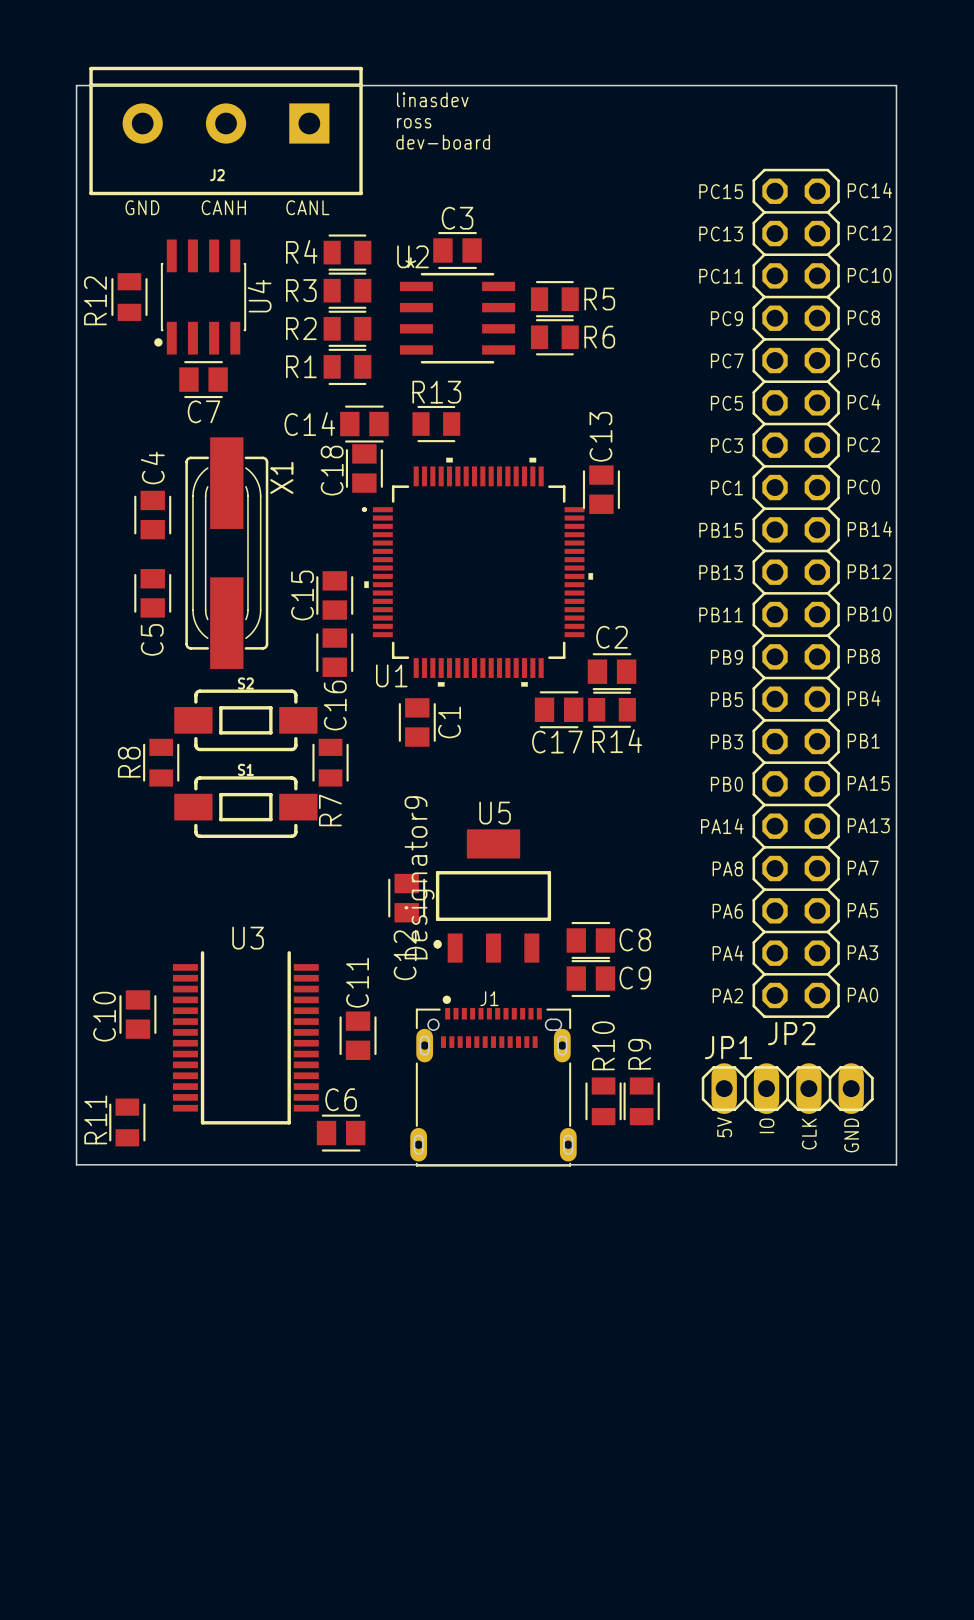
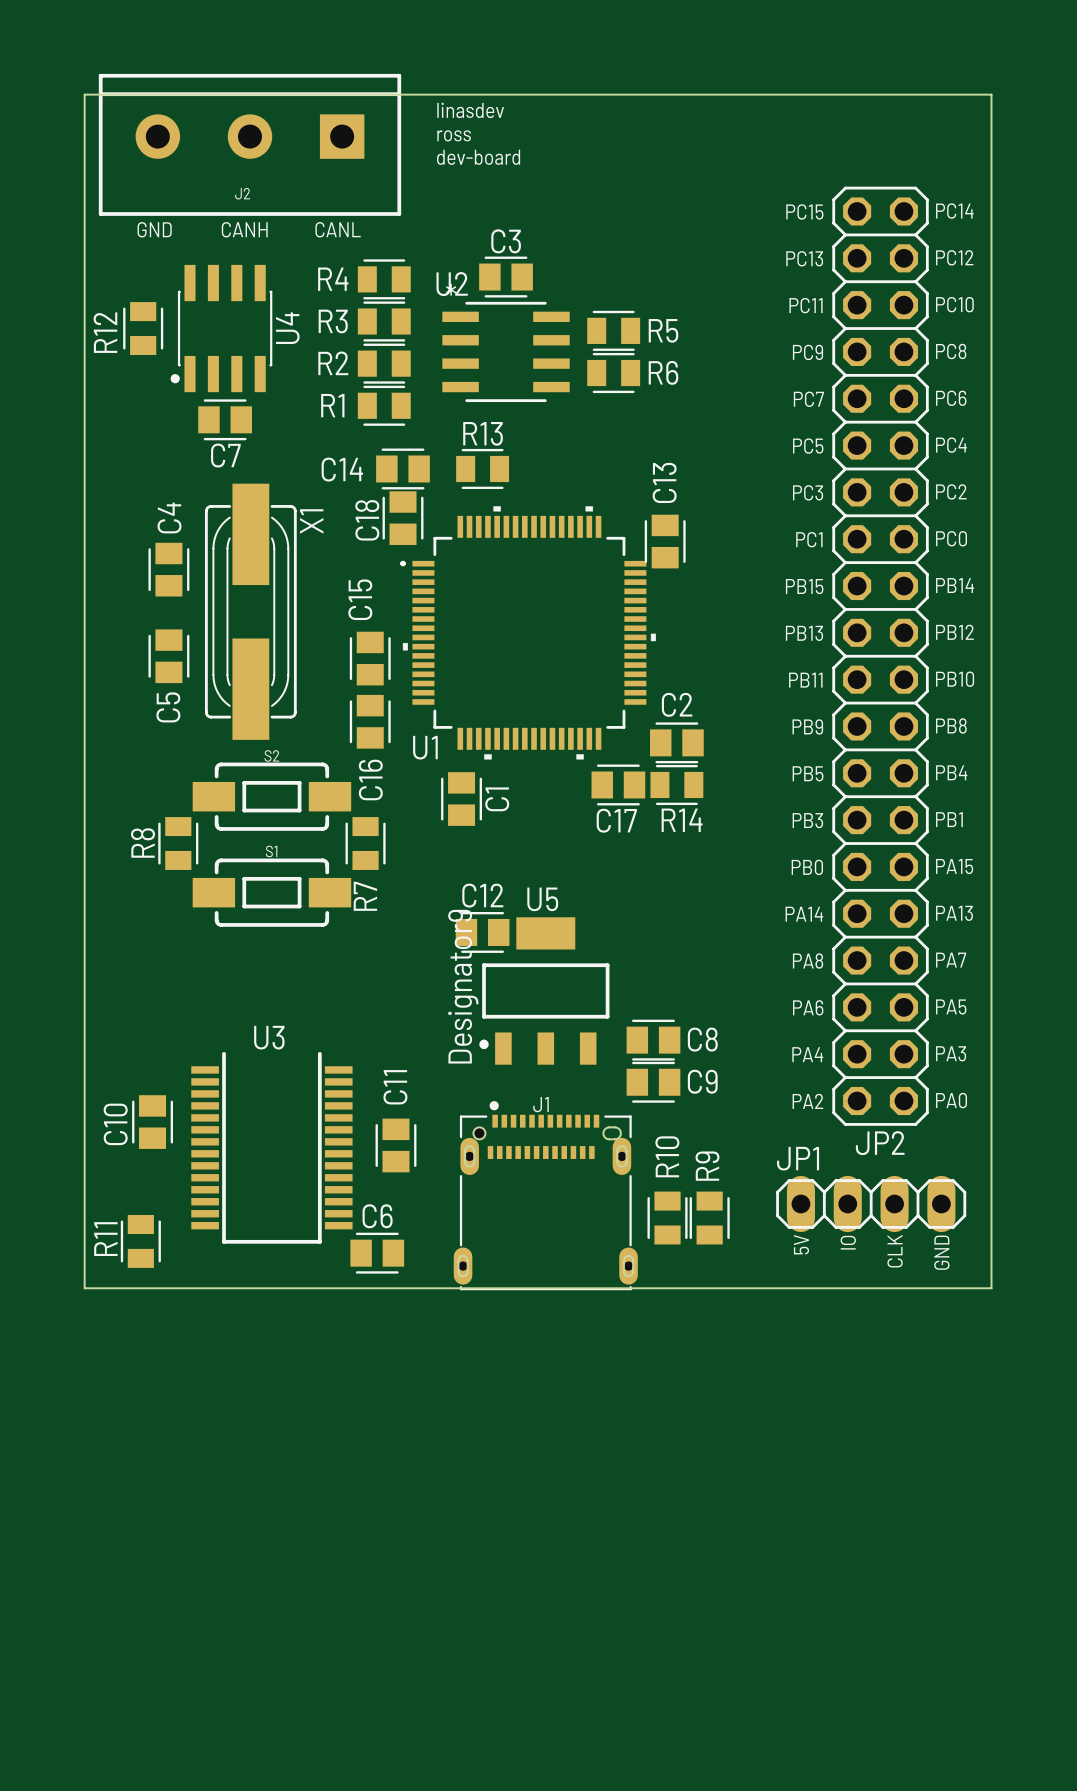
C15 name position: C15 (302, 595) -> C15 (360, 599)
C12 rotation: 0° (406, 898) -> 90° clockwise (482, 932)
C12 position: (406, 898) -> (482, 932)
C12 name position: C12 (405, 955) -> C12 (482, 895)

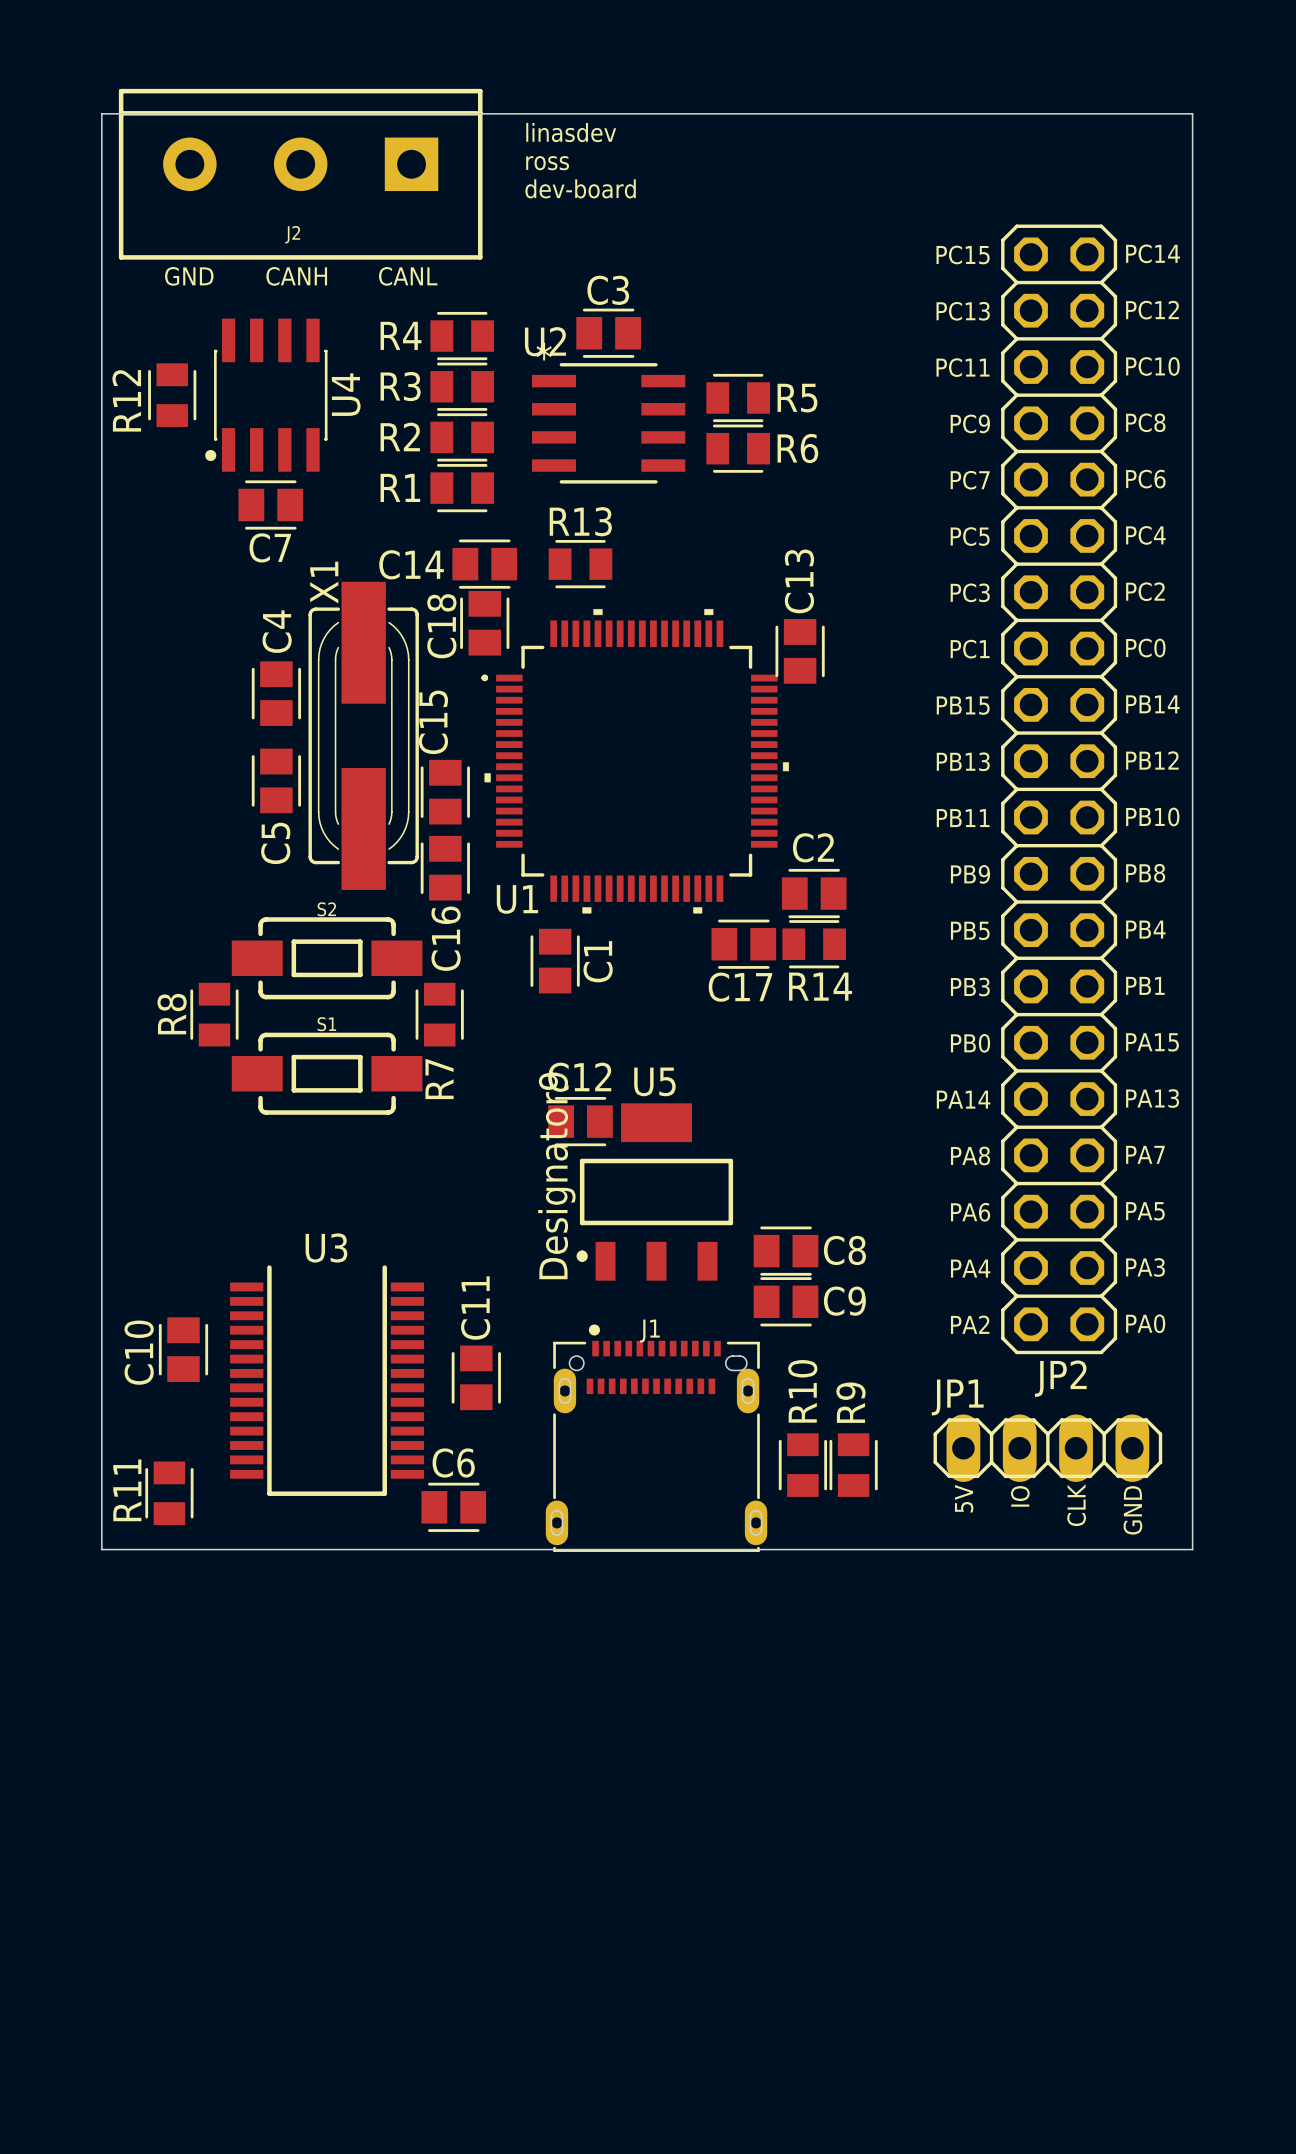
X1 name position: X1 (311, 521) -> X1 (324, 582)
C4 position: (168, 569) -> (276, 693)
X1 position: (250, 611) -> (363, 735)
C5 position: (168, 656) -> (276, 780)

